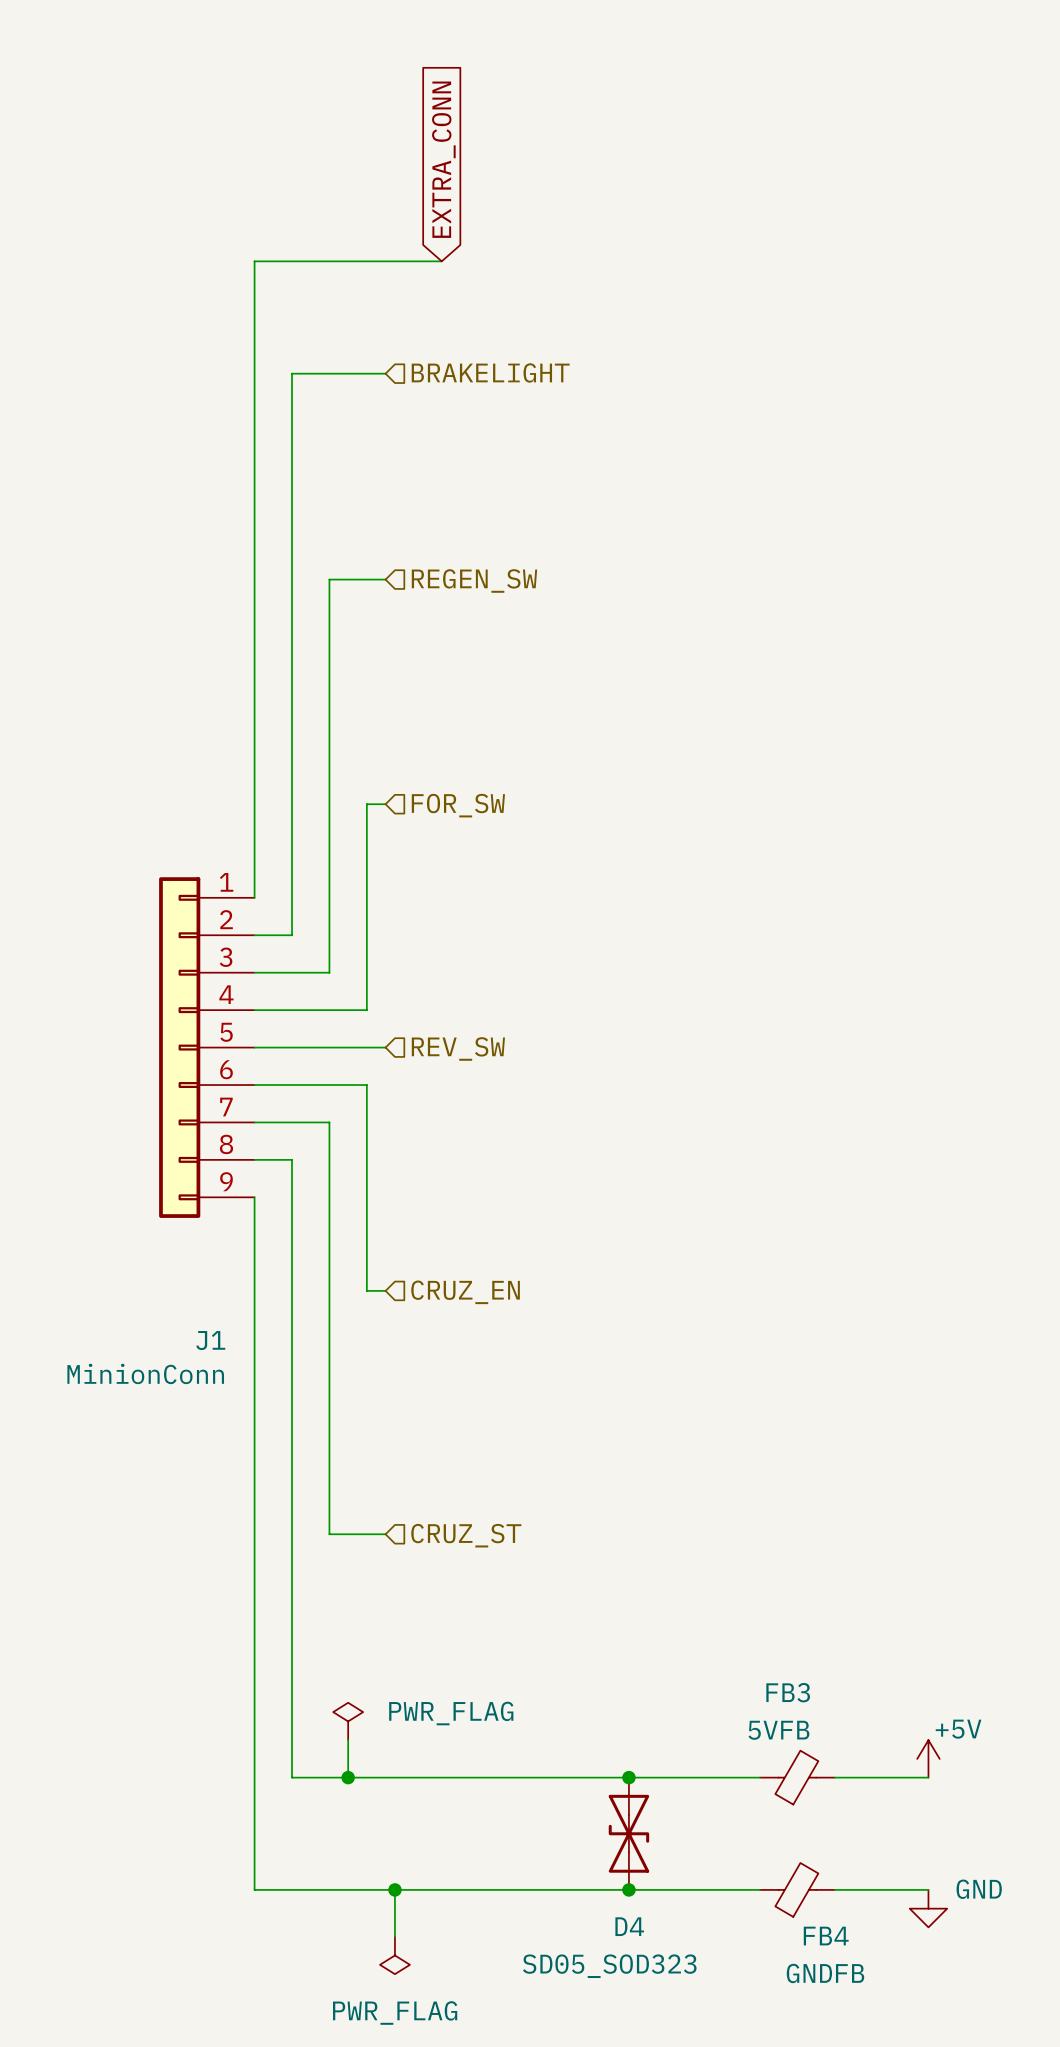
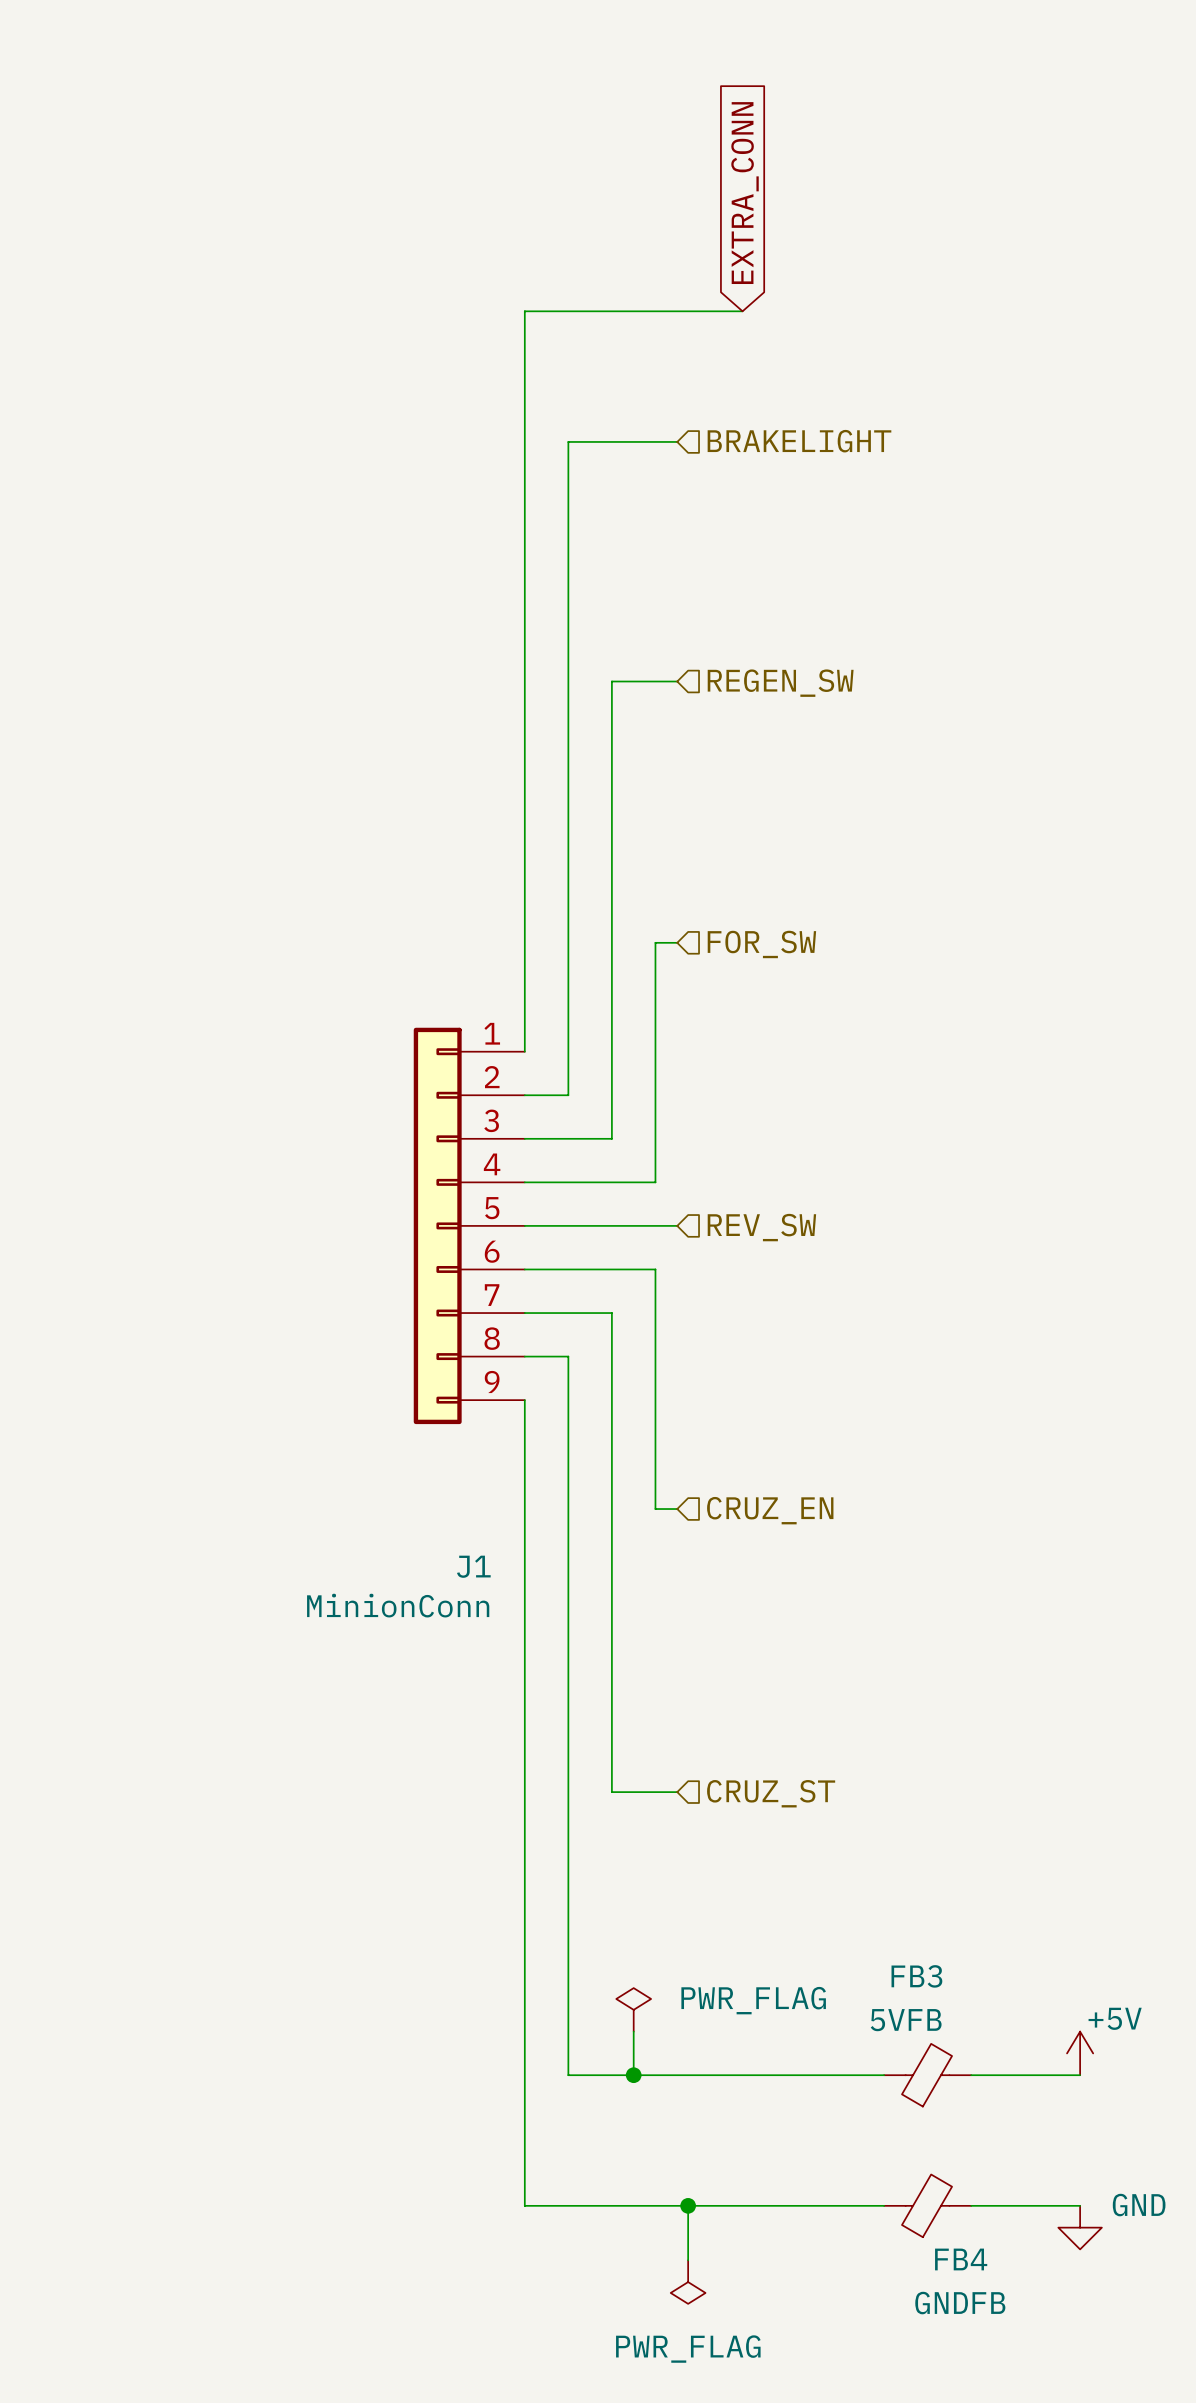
global label position: EXTRA_CONN (443, 159) -> EXTRA_CONN (745, 193)
wire: (441, 261) (254, 261) (254, 897) -> (742, 311) (524, 311) (524, 1051)
hierarchical label position: BRAKELIGHT (490, 372) -> BRAKELIGHT (799, 441)
wire: (385, 373) (292, 373) (292, 935) (254, 935) -> (677, 441) (568, 441) (568, 1095) (524, 1095)
wire: (385, 579) (329, 579) (329, 972) (254, 972) -> (677, 681) (611, 681) (611, 1138) (524, 1138)
hierarchical label position: REGEN_SW (474, 580) -> REGEN_SW (780, 683)
wire: (385, 804) (366, 804) (366, 1010) (254, 1010) -> (677, 942) (655, 942) (655, 1182) (524, 1182)
hierarchical label position: FOR_SW (458, 805) -> FOR_SW (761, 944)
J1 position: (206, 1047) -> (469, 1225)
wire: (254, 1047) (385, 1047) -> (524, 1225) (677, 1225)
hierarchical label position: REV_SW (458, 1048) -> REV_SW (761, 1227)
wire: (254, 1085) (366, 1085) (366, 1290) (385, 1290) -> (524, 1269) (655, 1269) (655, 1509) (677, 1509)
wire: (254, 1122) (329, 1122) (329, 1534) (385, 1534) -> (524, 1313) (611, 1313) (611, 1792) (677, 1792)
wire: (254, 1159) (292, 1159) (292, 1777) (488, 1777) -> (524, 1356) (568, 1356) (568, 2075)
wire: (254, 1197) (254, 1889) (451, 1889) -> (524, 1400) (524, 2205)
hierarchical label position: CRUZ_EN (465, 1292) -> CRUZ_EN (770, 1510)
hierarchical label position: CRUZ_ST (466, 1535) -> CRUZ_ST (771, 1793)
power symbol: PWR_FLAG (348, 1721) -> none
power symbol: none -> PWR_FLAG (633, 2009)
wire: (348, 1740) (348, 1777) -> (633, 2031) (633, 2075)
junction: (348, 1777) -> none
junction: none -> (633, 2075)
junction: (628, 1777) -> none
D4: SD05_SOD323 (628, 1833) -> none
wire: (394, 1889) (394, 1936) -> (688, 2205) (688, 2260)
junction: (394, 1889) -> none
junction position: (628, 1889) -> (688, 2205)
power symbol: PWR_FLAG (394, 1955) -> none
power symbol: none -> PWR_FLAG (688, 2282)

